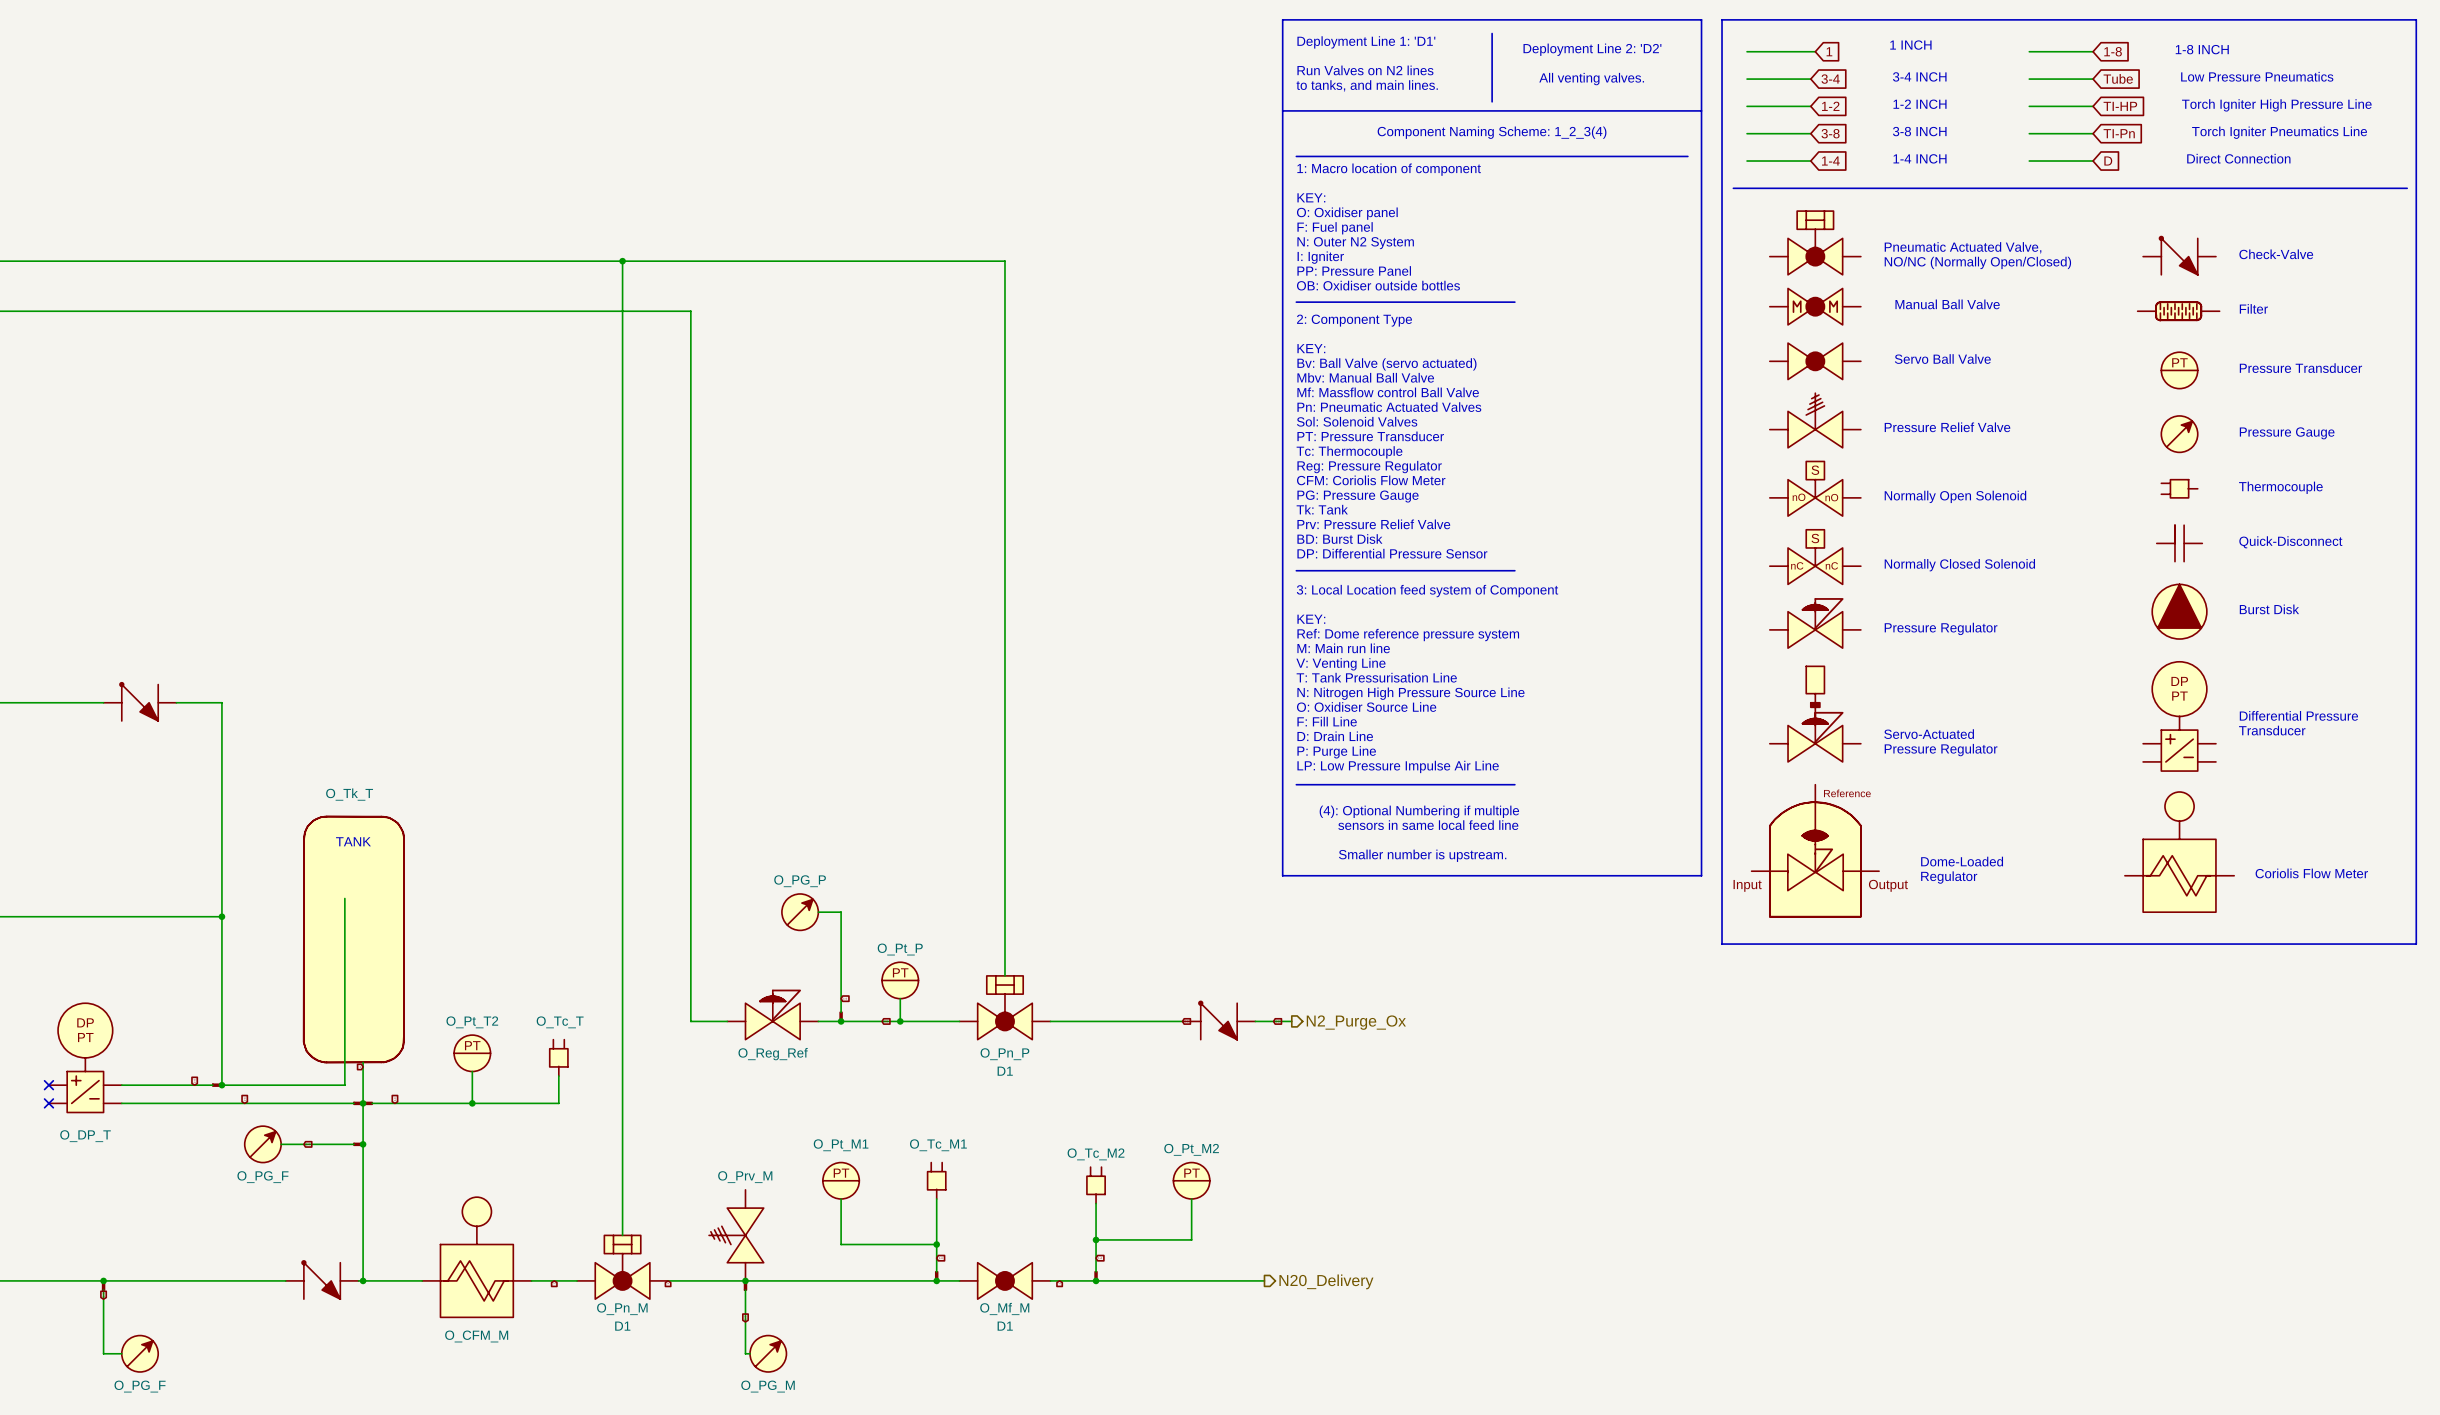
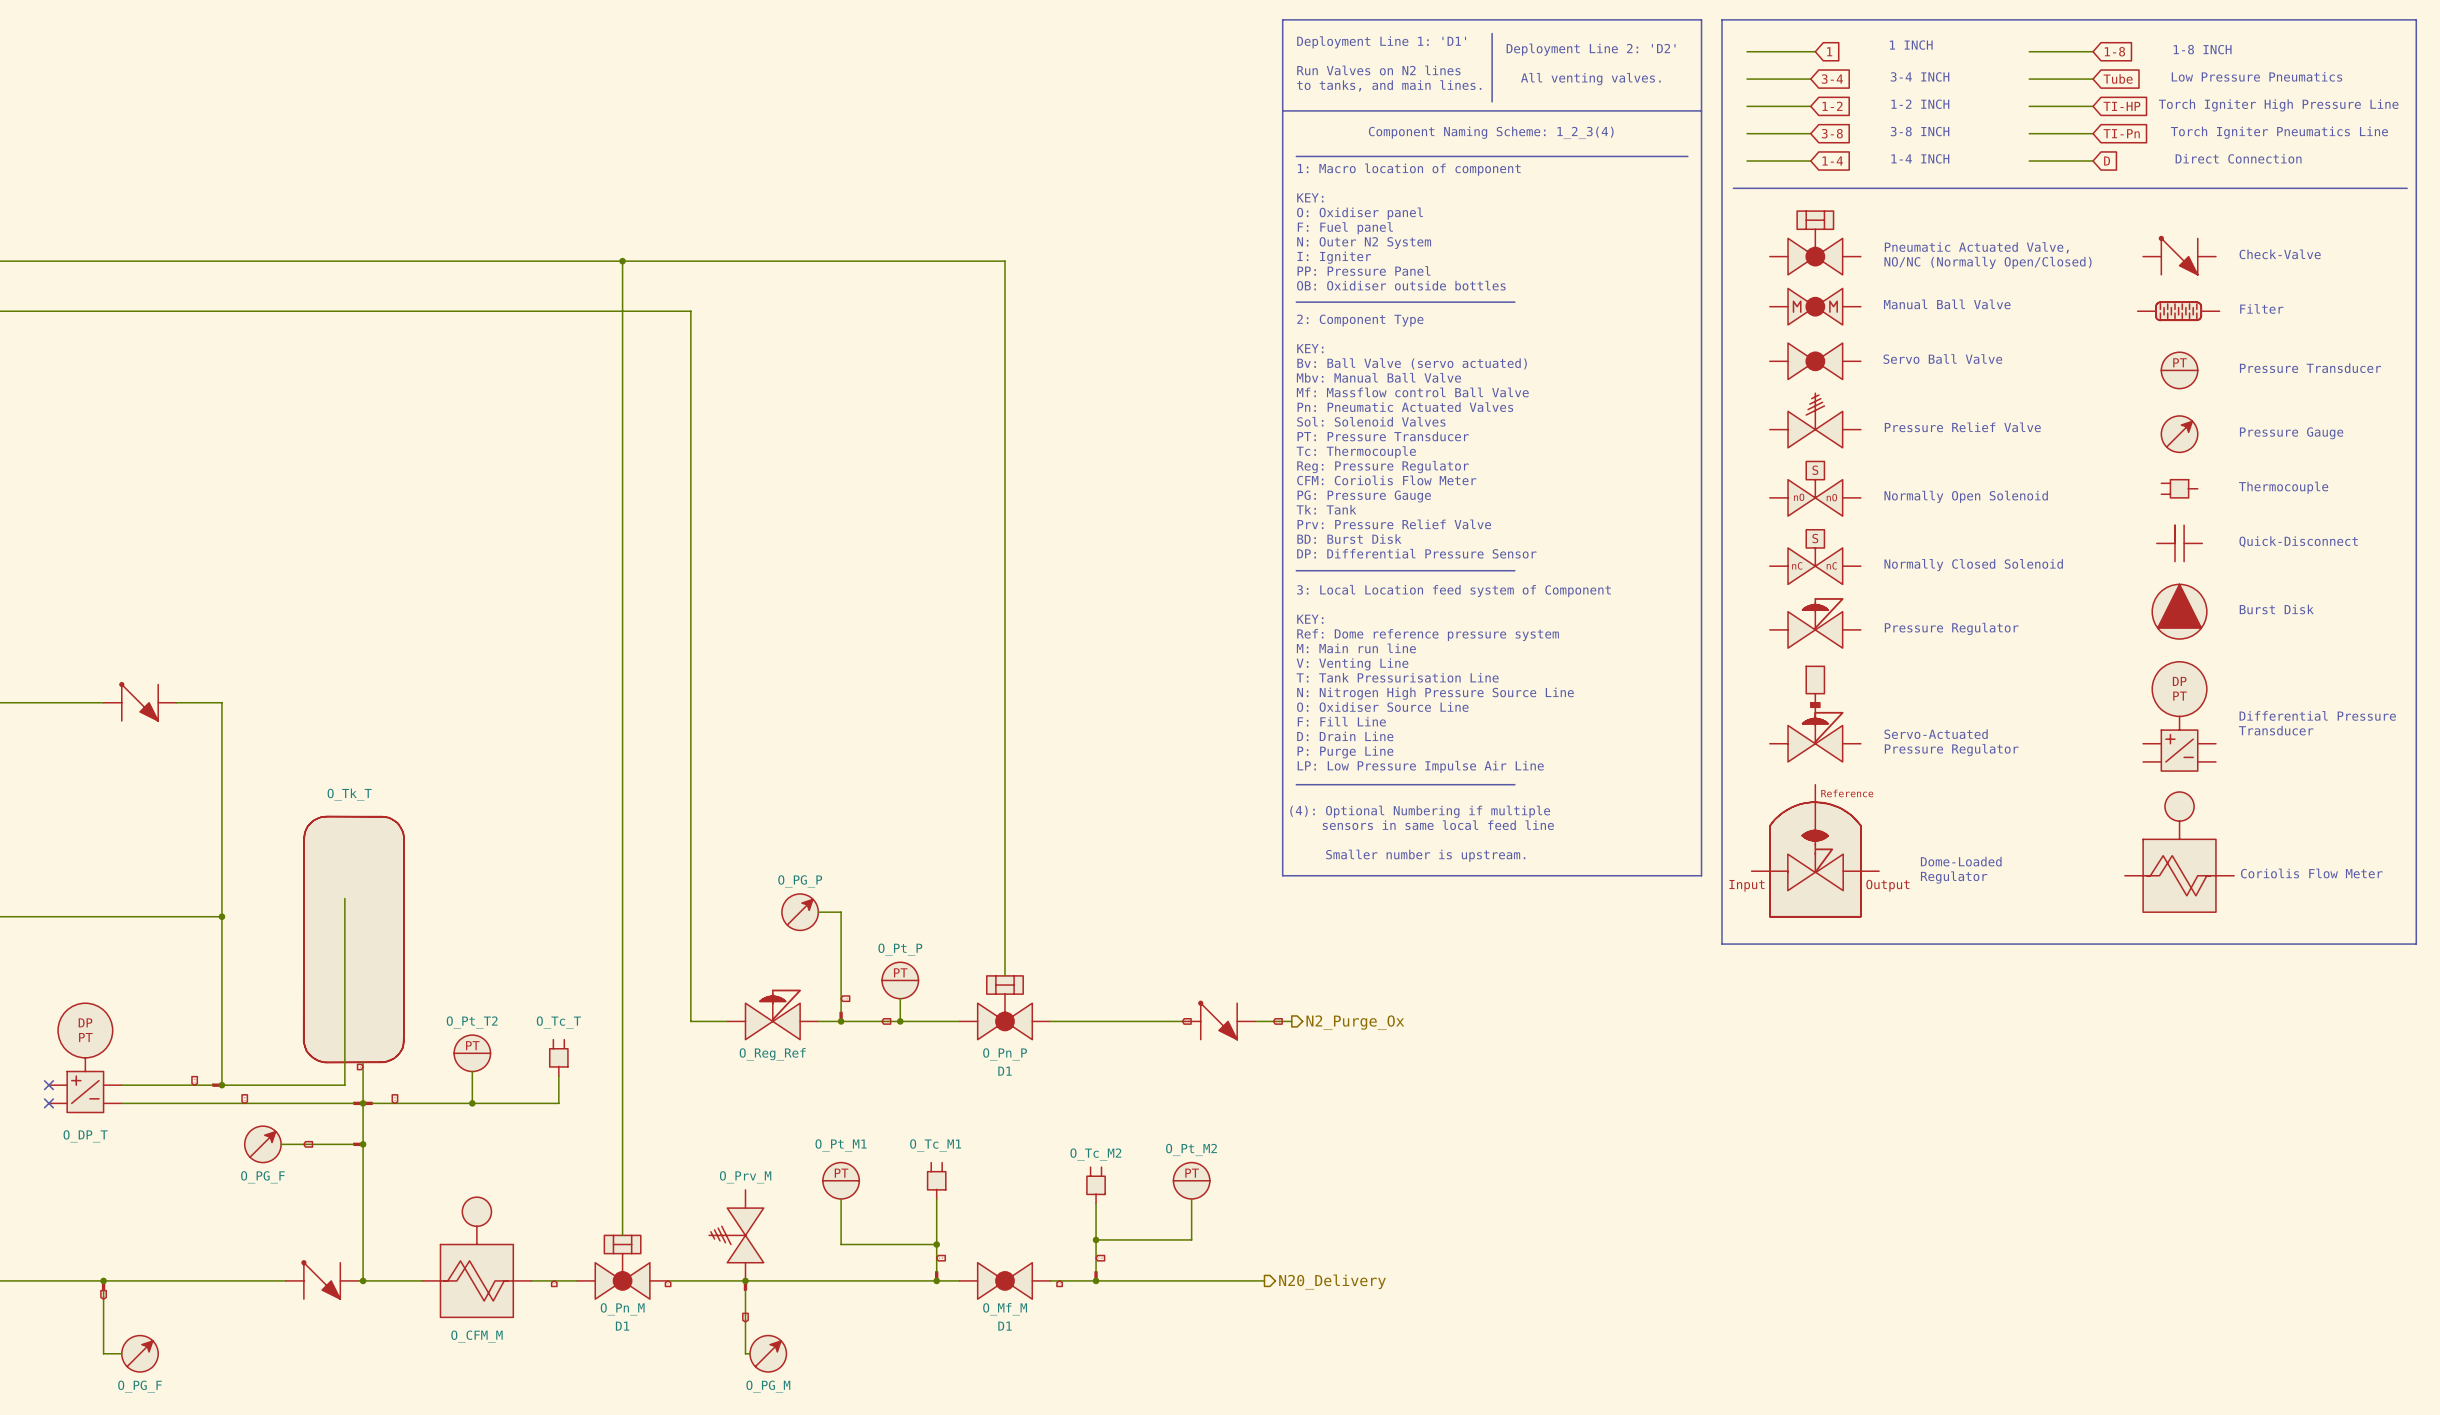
text: TANK (353, 841) -> none

